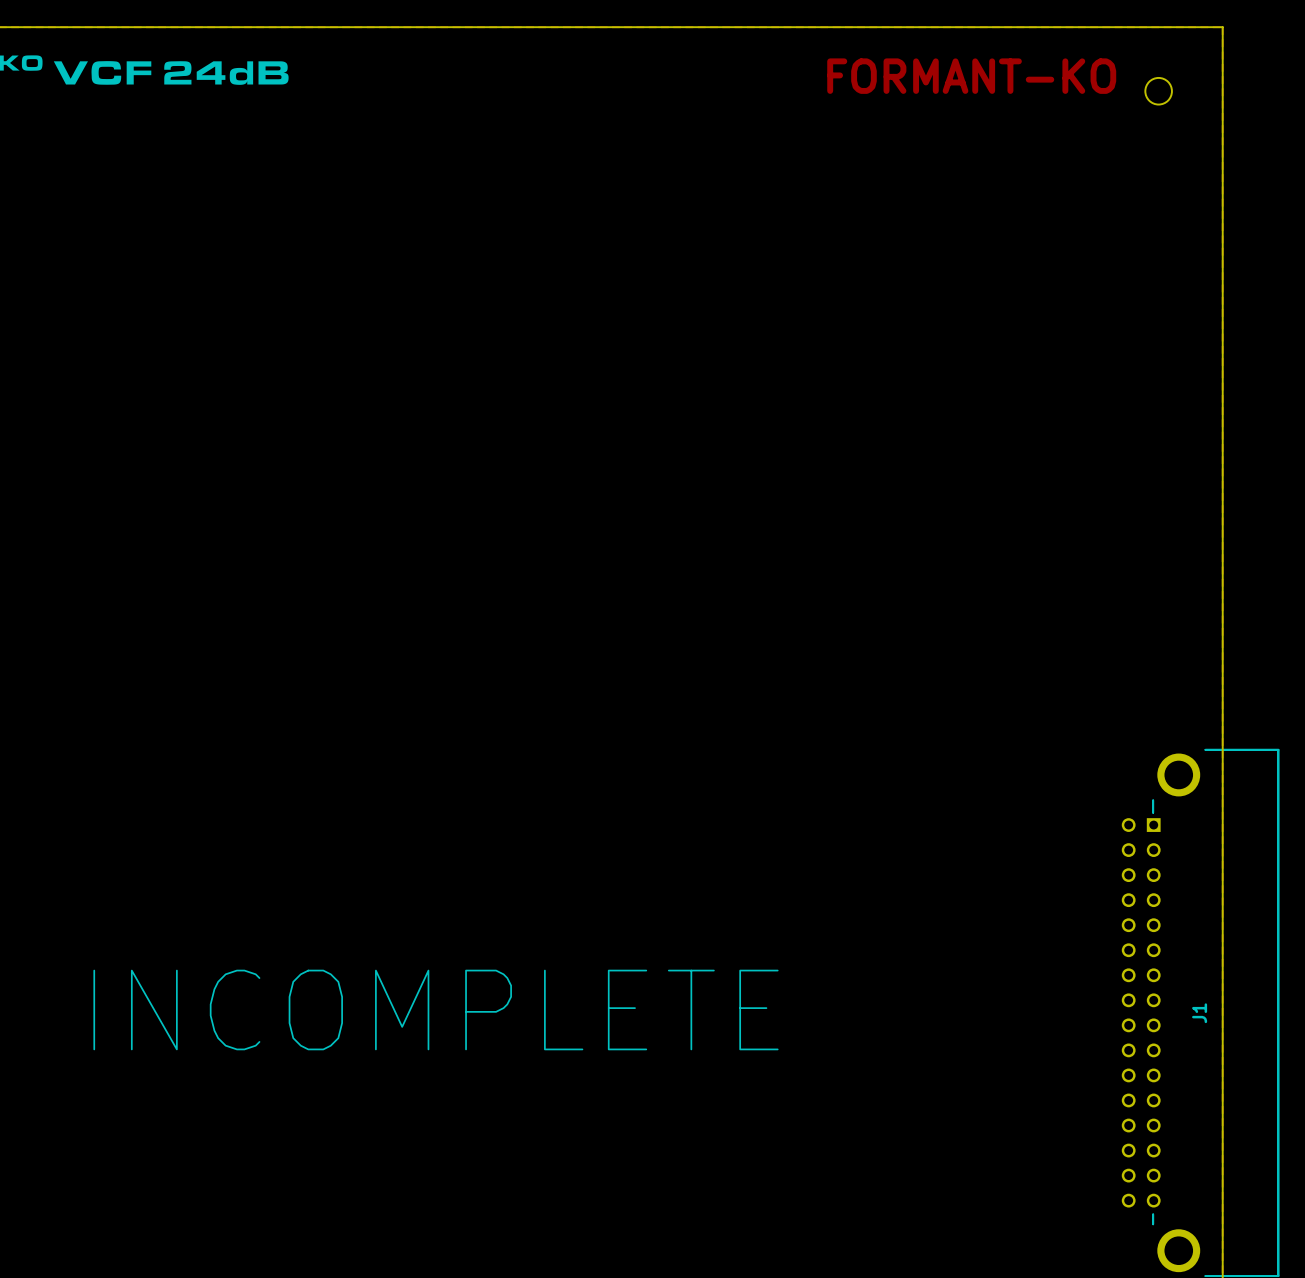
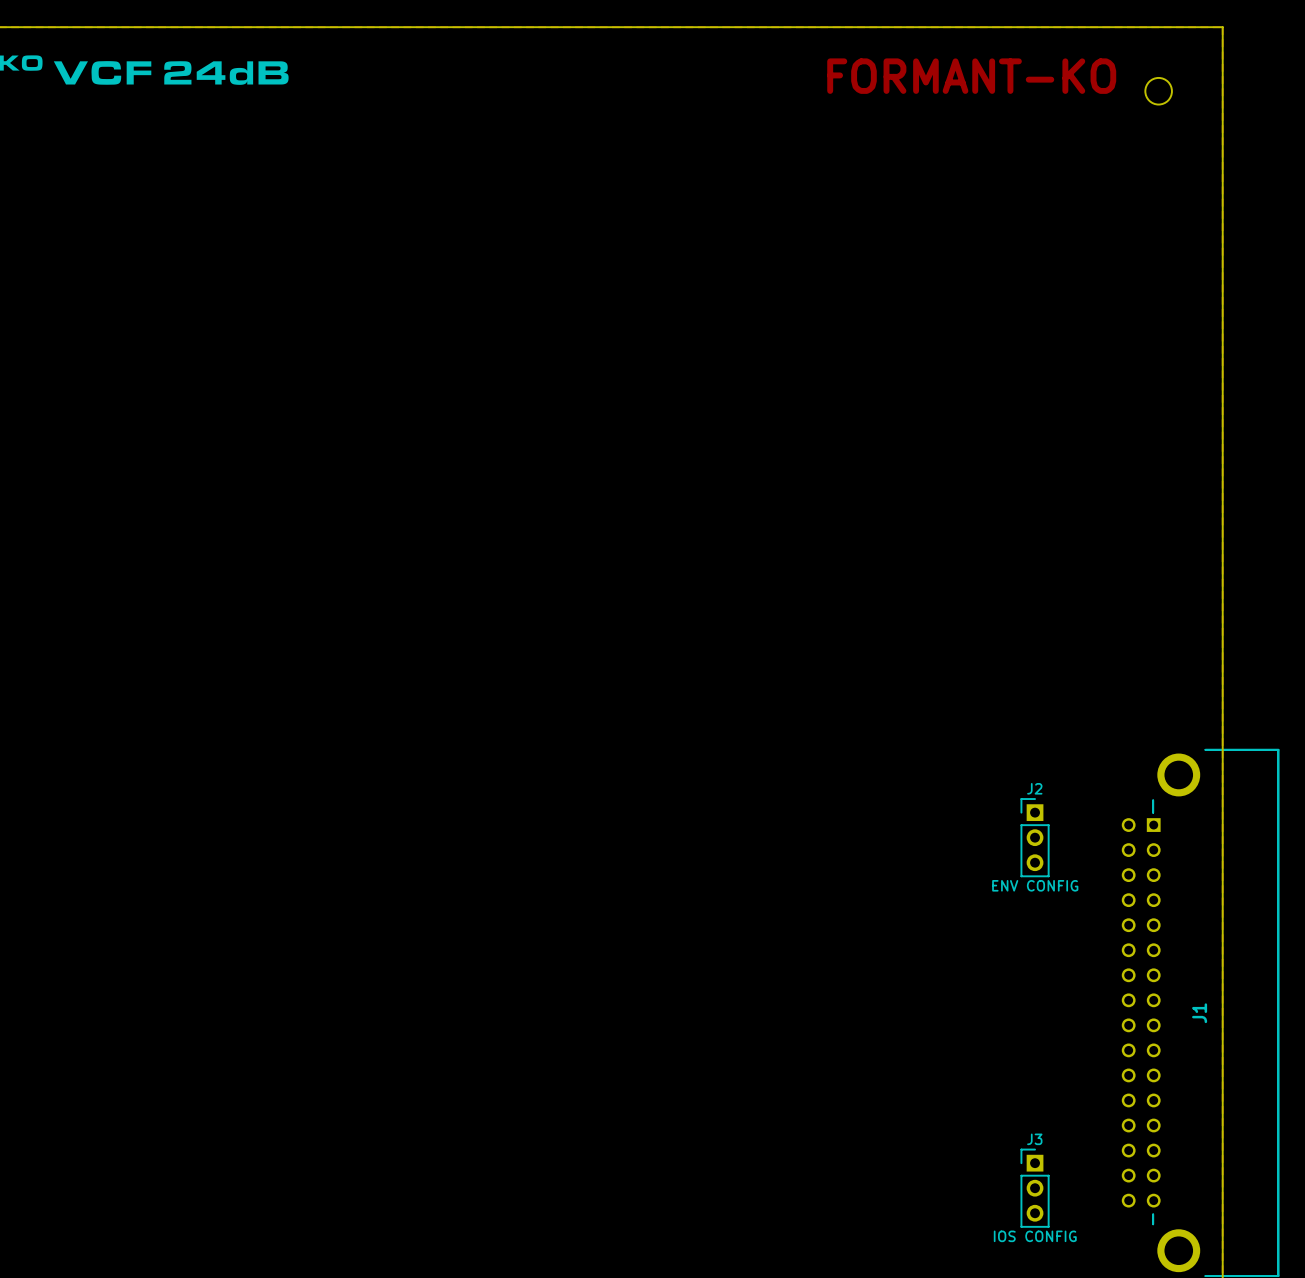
J2: none -> ENV CONFIG (1035, 837)
text: INCOMPLETE (435, 1009) -> none
J3: none -> IOS CONFIG (1035, 1188)

